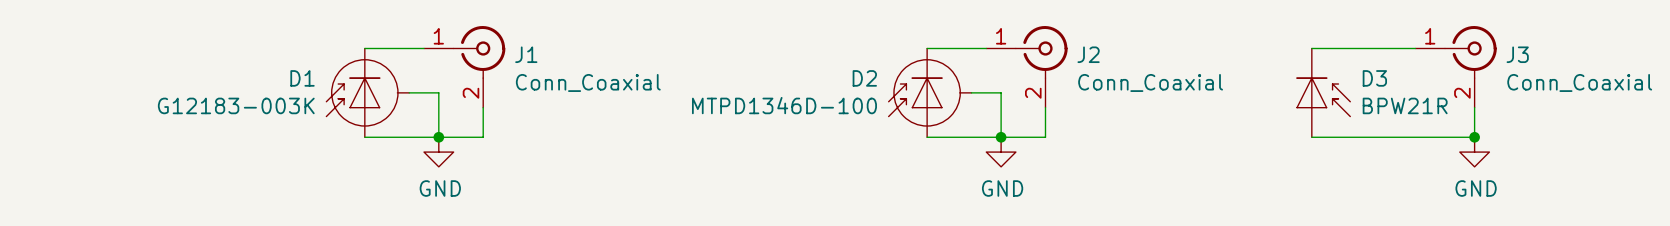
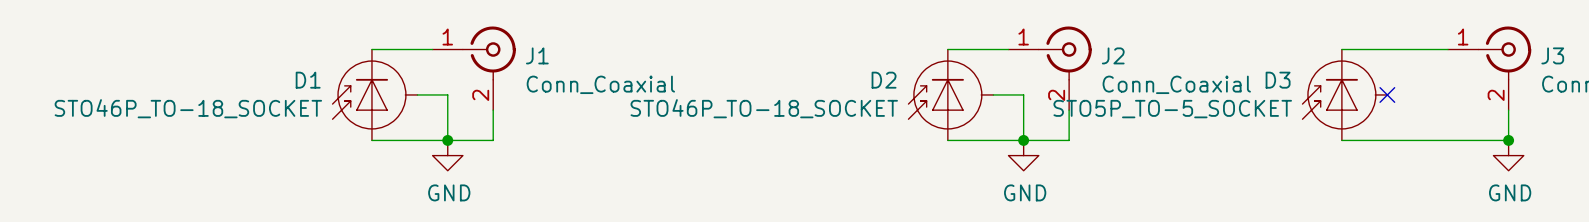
D3 symbol: [1296, 48, 1351, 138] -> [1302, 49, 1388, 141]
D3 name position: D3 (1374, 78) -> D3 (1278, 80)
no-connect mark: none -> (1387, 94)
D1 value: G12183-003K (236, 105) -> STO46P_TO-18_SOCKET (188, 108)
D2 value: MTPD1346D-100 (784, 105) -> STO46P_TO-18_SOCKET (764, 108)
D3 value: BPW21R (1405, 105) -> STO5P_TO-5_SOCKET (1172, 109)

